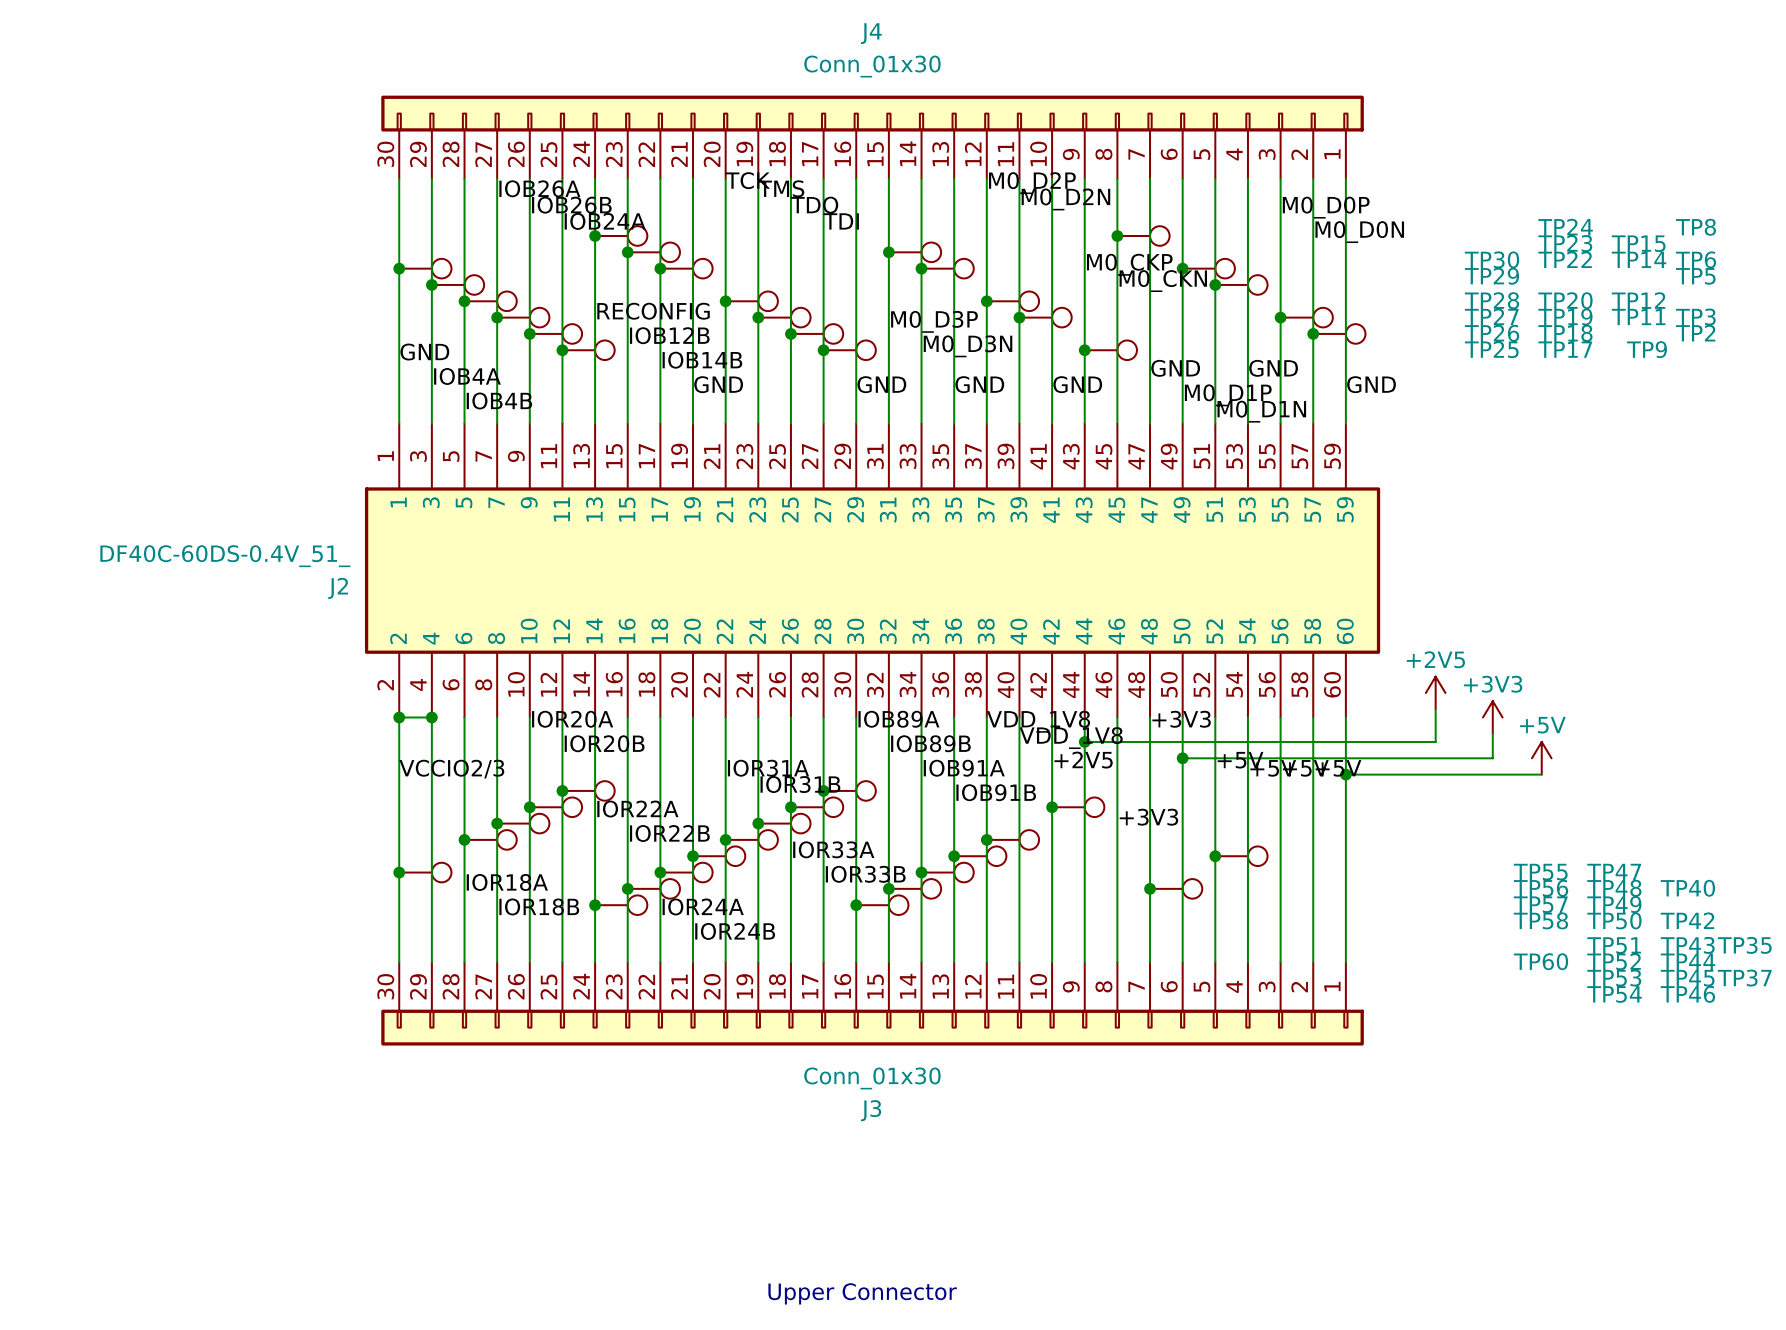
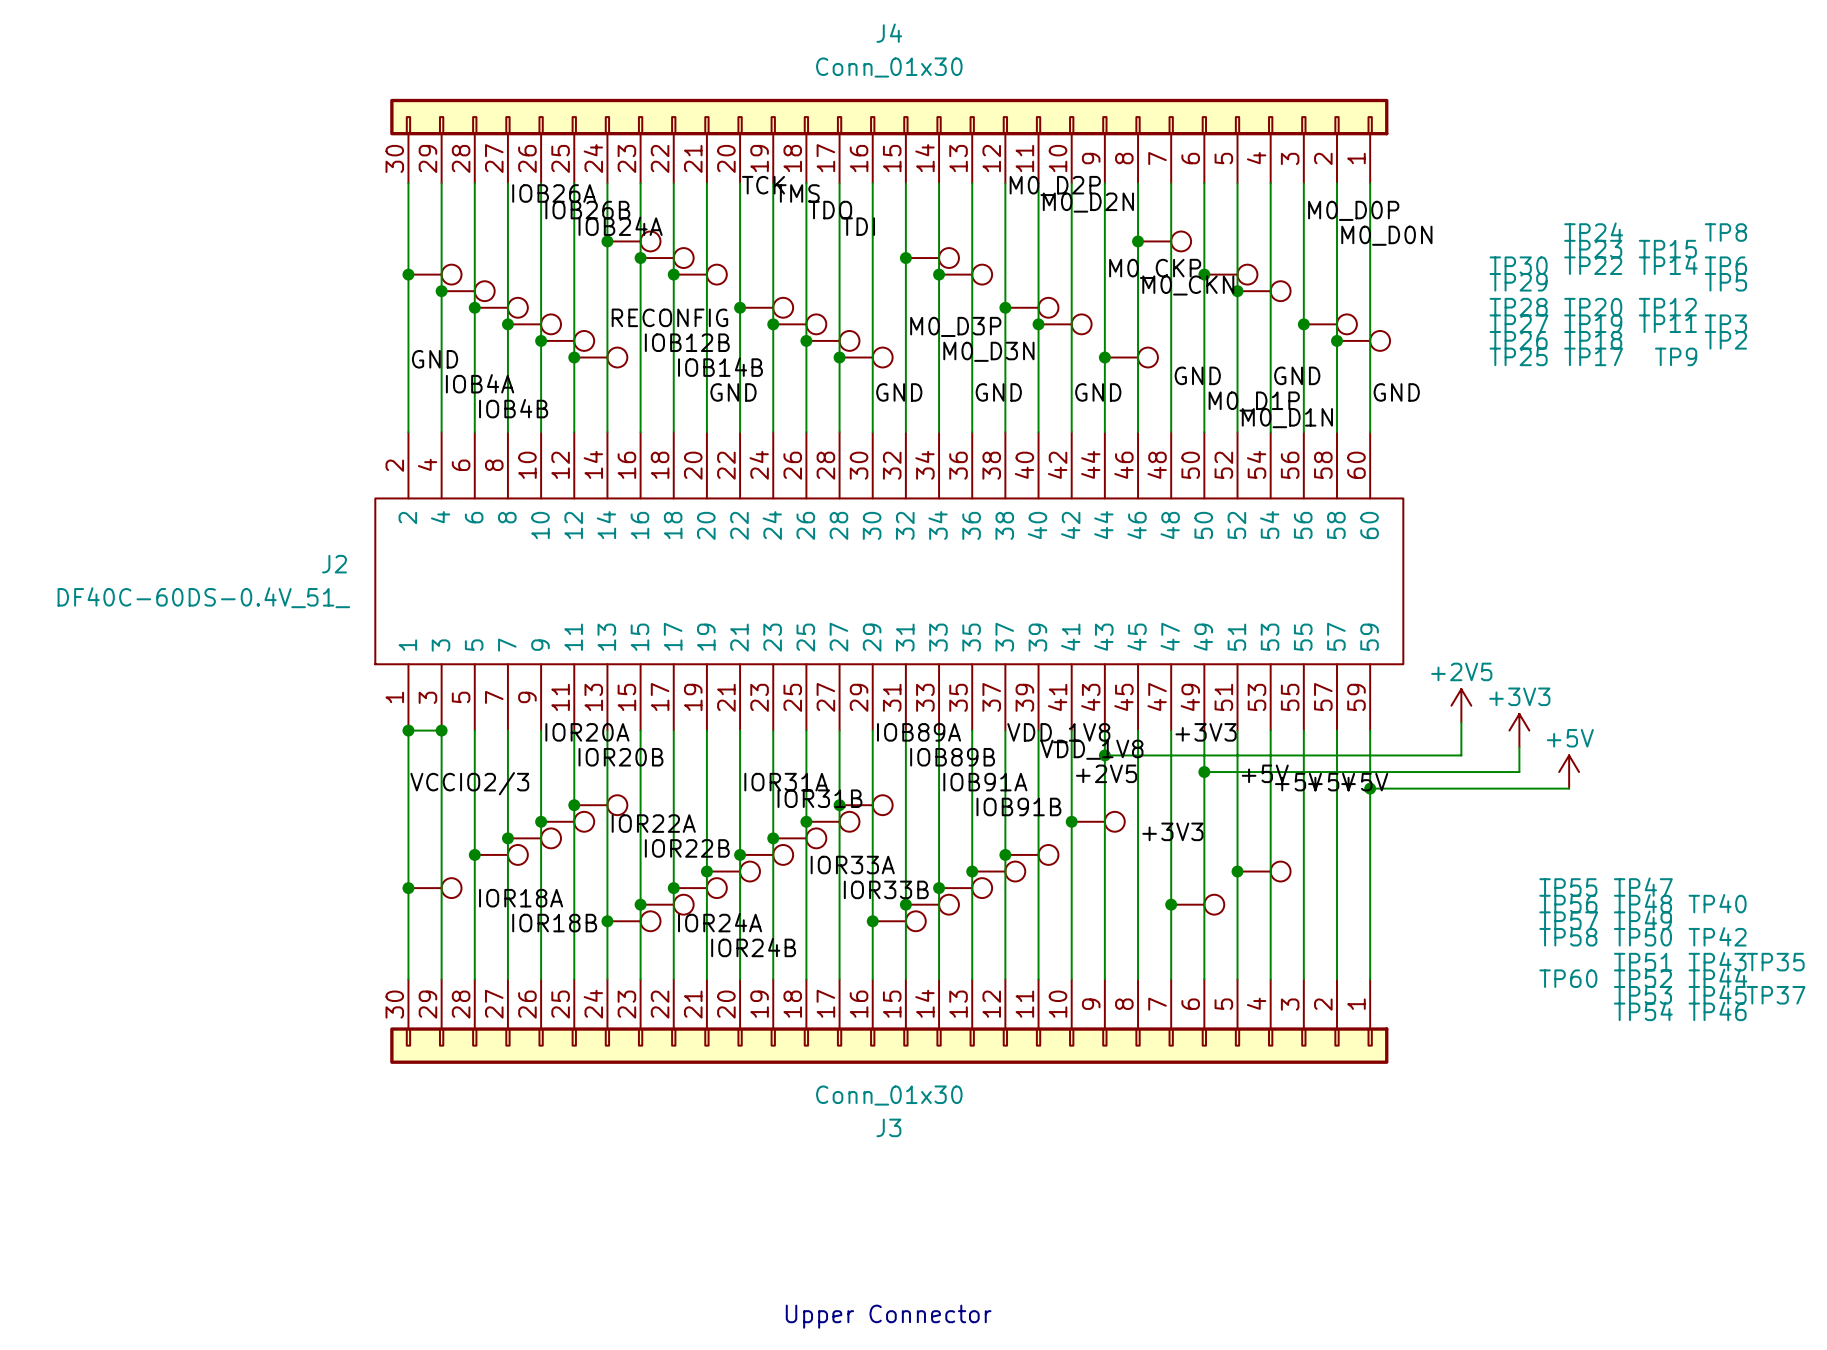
J2 symbol: [364, 423, 1381, 718] -> [374, 432, 1405, 731]
J2 value position: DF40C-60DS-0.4V_51_ (225, 556) -> DF40C-60DS-0.4V_51_ (203, 597)
J2 name position: J2 (338, 588) -> J2 (334, 564)

